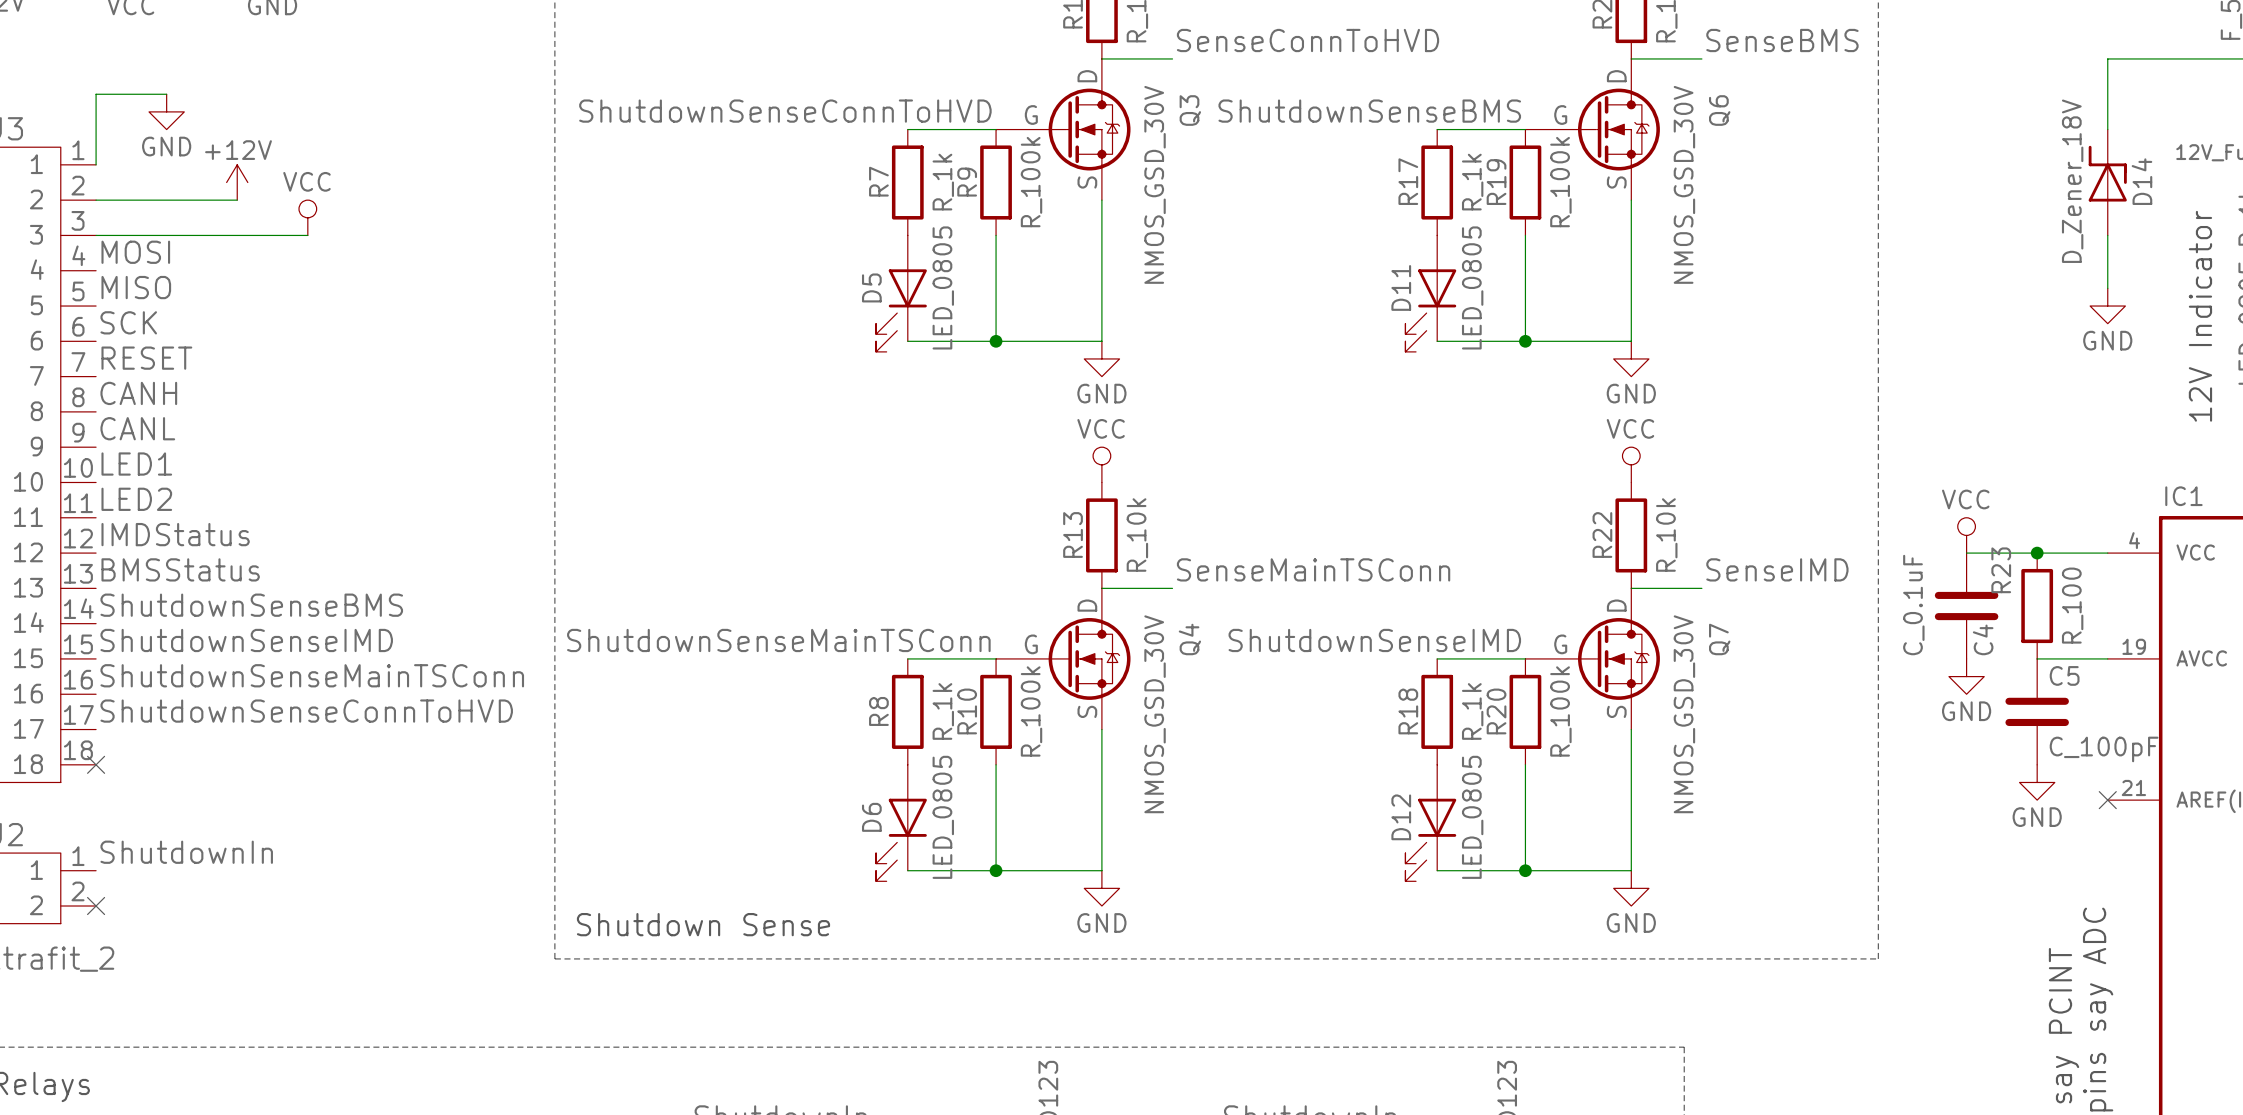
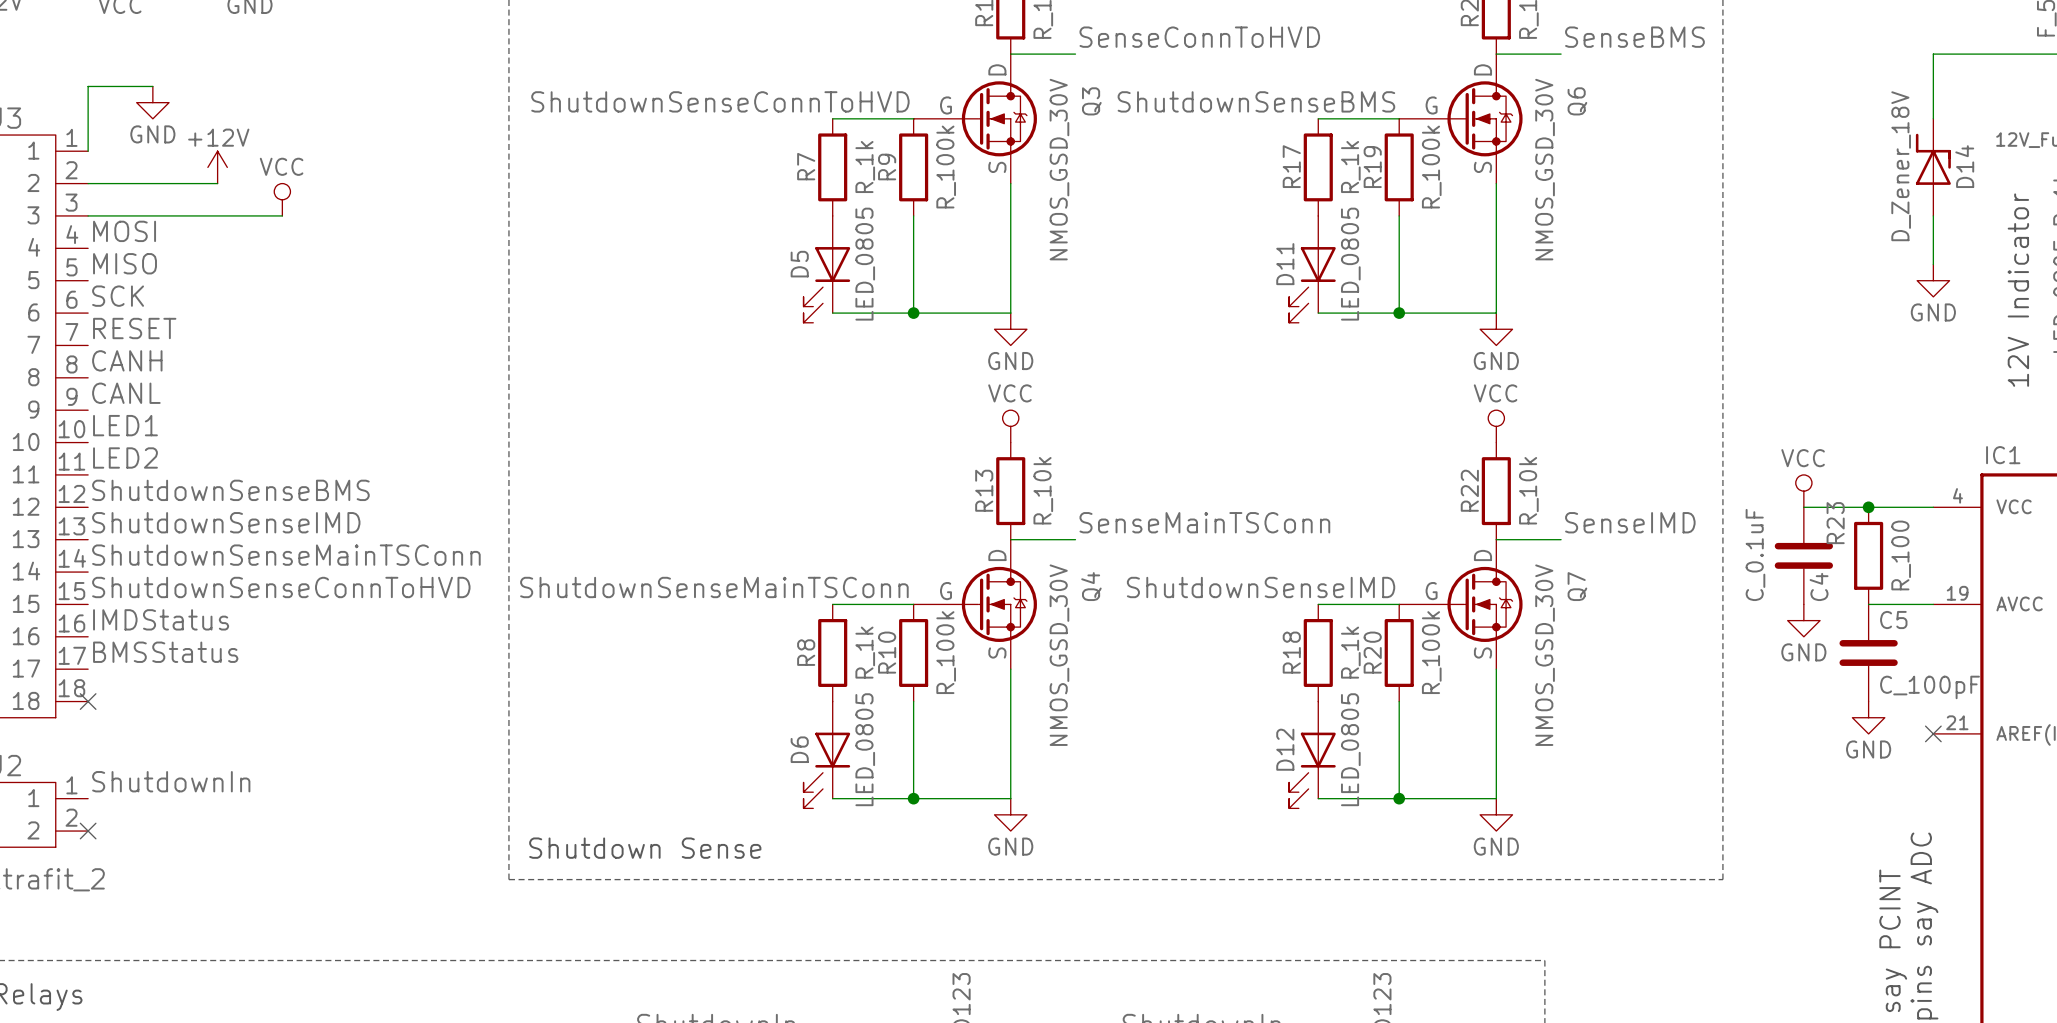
label: IMDStatus (175, 534) -> ShutdownSenseBMS (230, 490)
label: BMSStatus (180, 569) -> ShutdownSenseIMD (226, 522)
label: ShutdownSenseBMS (251, 605) -> ShutdownSenseMainTSConn (286, 555)
label: ShutdownSenseIMD (246, 640) -> ShutdownSenseConnToHVD (281, 587)
label: ShutdownSenseMainTSConn (312, 675) -> IMDStatus (161, 619)
label: ShutdownSenseConnToHVD (306, 711) -> BMSStatus (165, 652)

